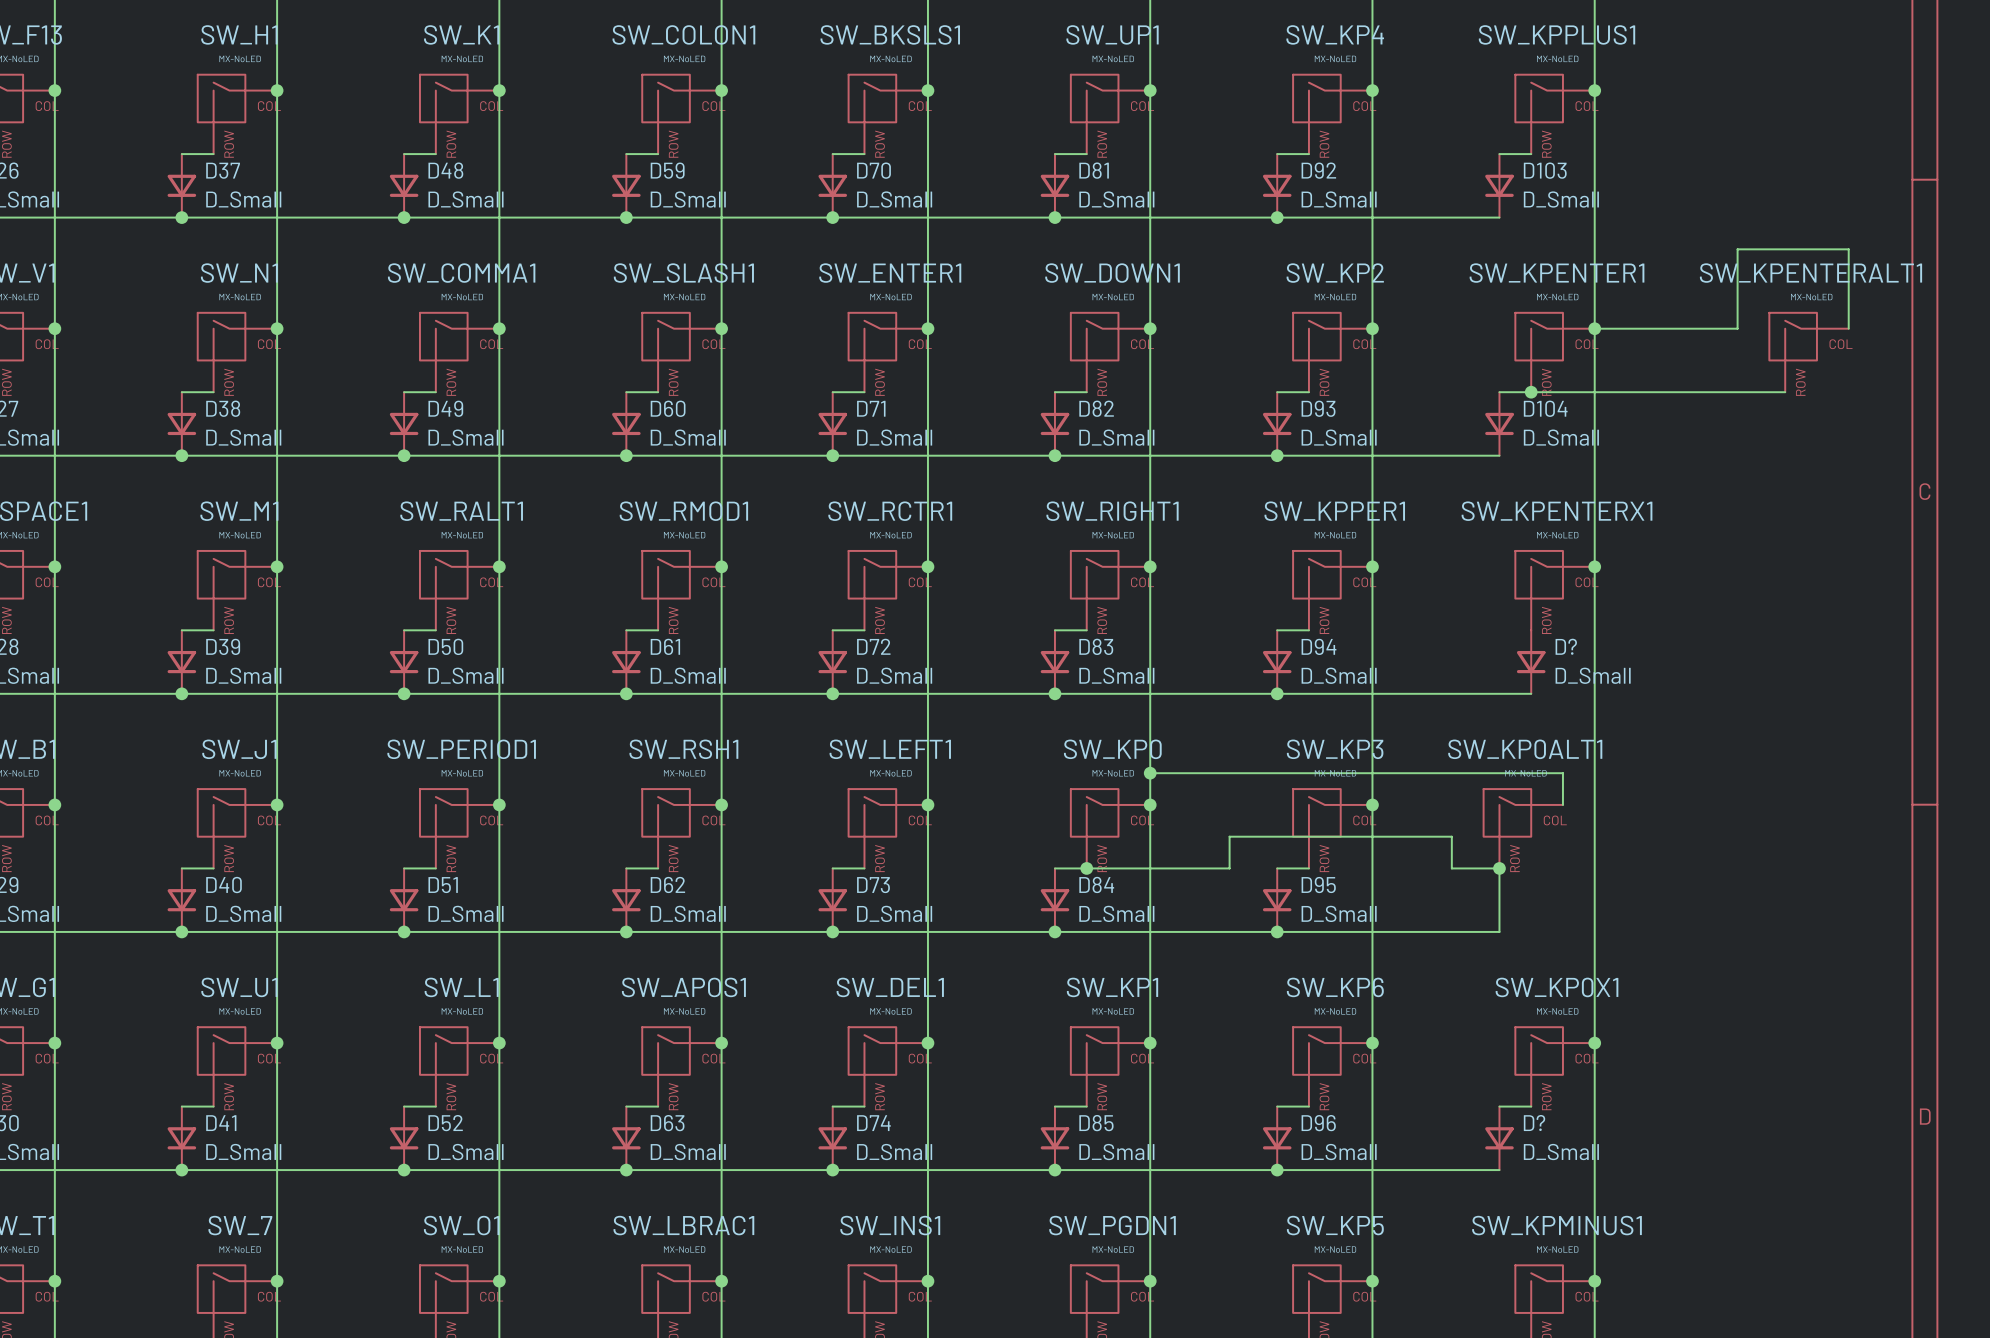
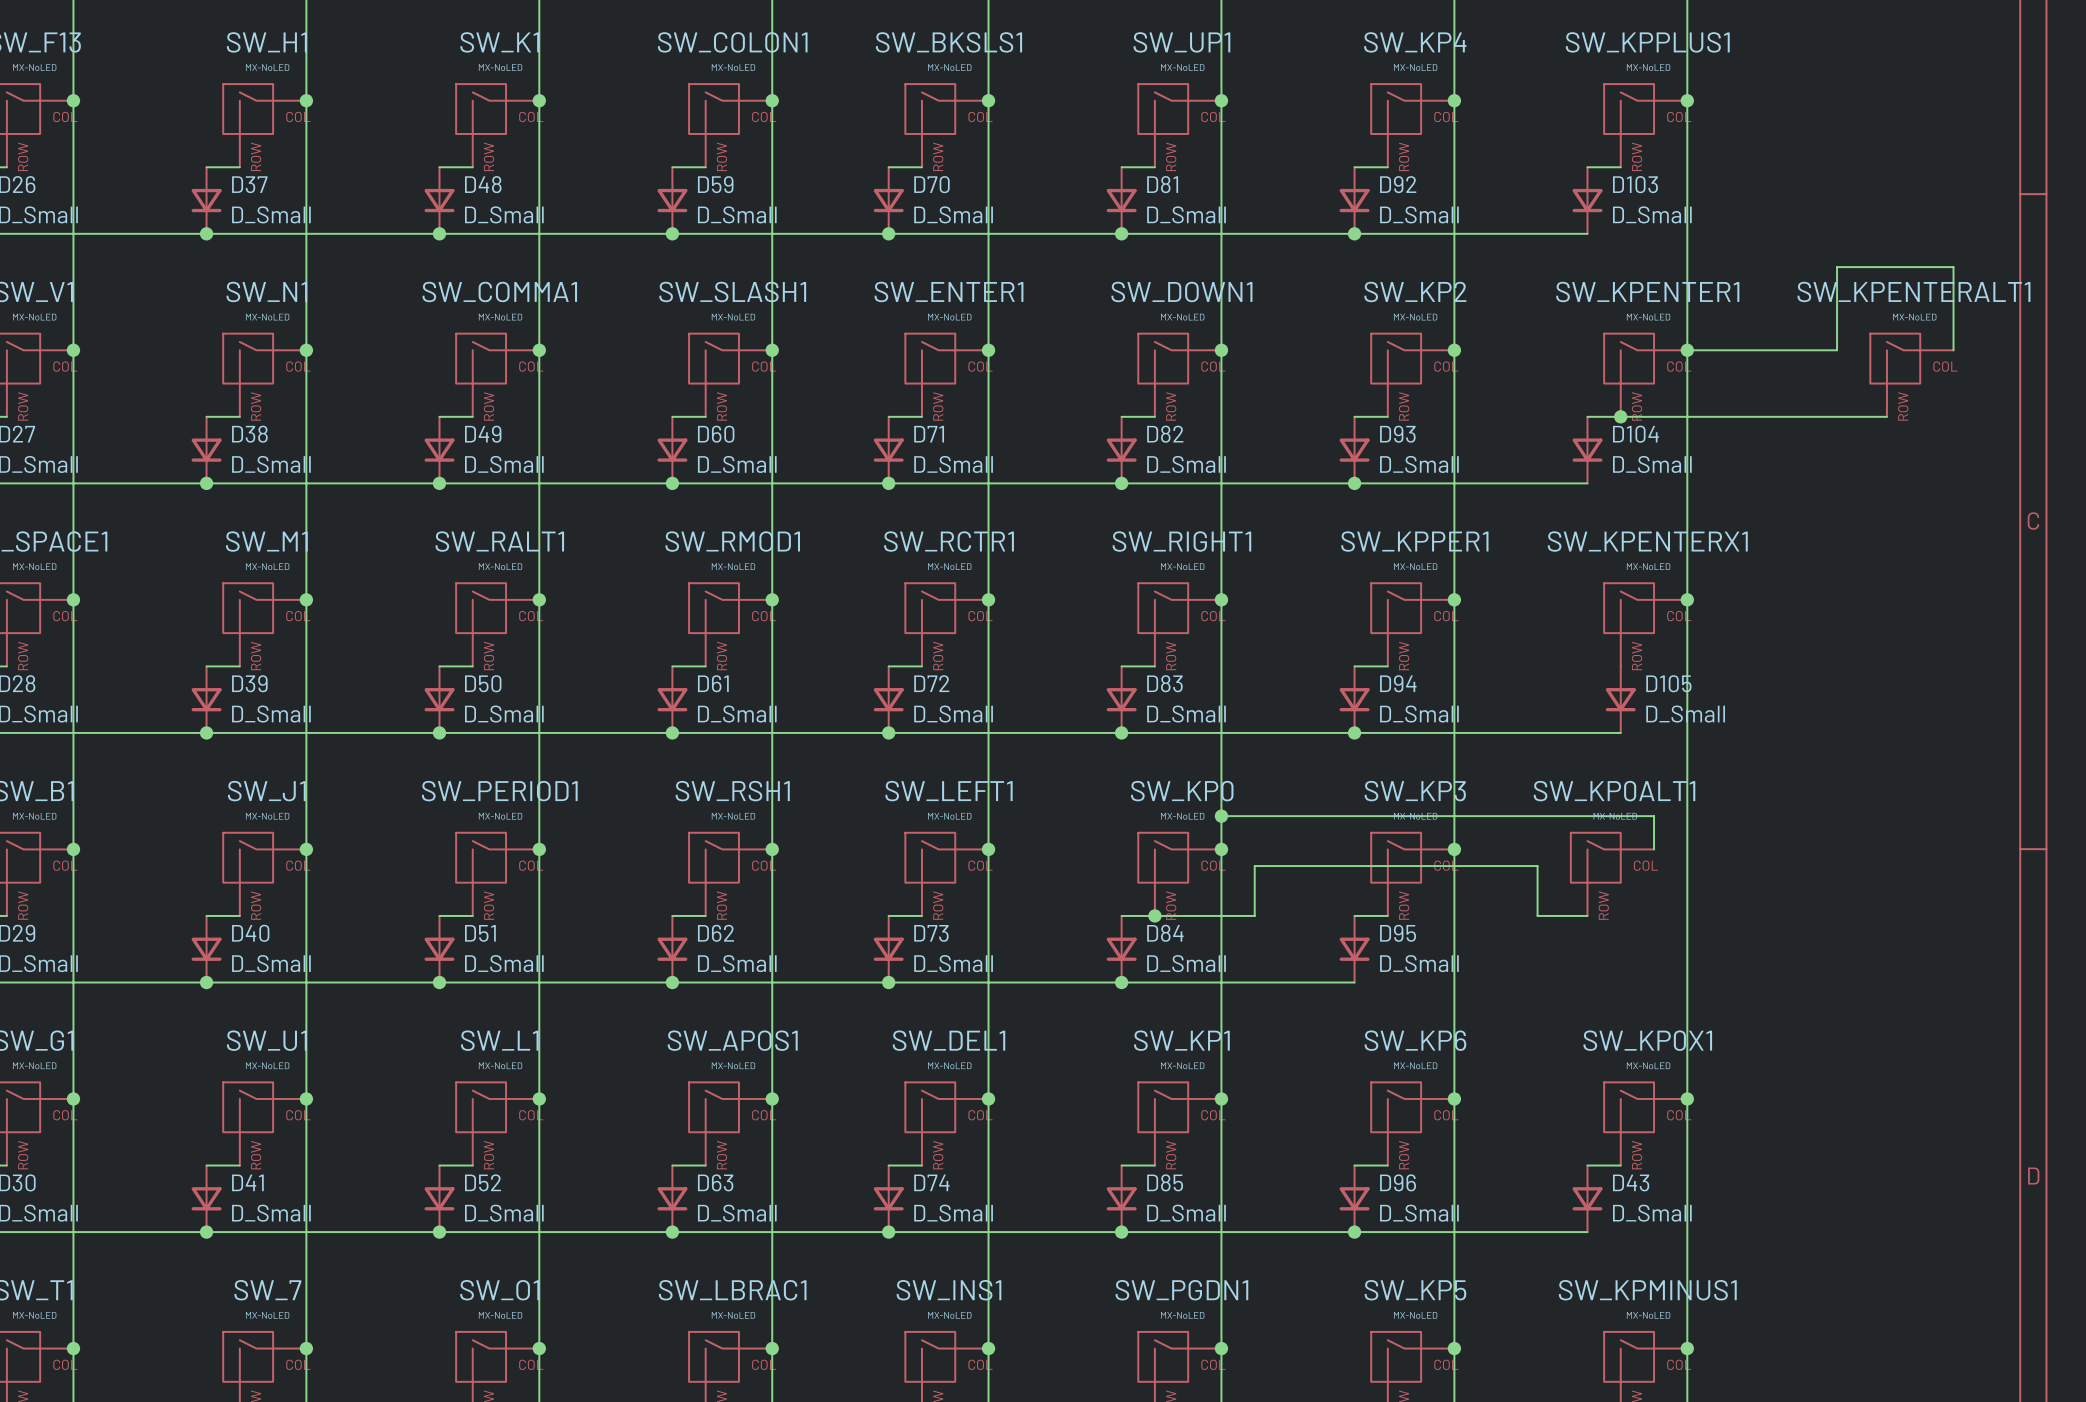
D? name: D? (1566, 646) -> D105 (1668, 683)
wire: (1451, 836) (1229, 836) (1229, 868) (1181, 868) -> (1537, 882) (1537, 866) (1254, 866) (1254, 915)
wire: (1499, 868) (1499, 931) (1277, 931) -> none
junction: (1499, 868) -> none
junction: (1277, 931) -> none
D? name: D? (1534, 1123) -> D43 (1631, 1182)

